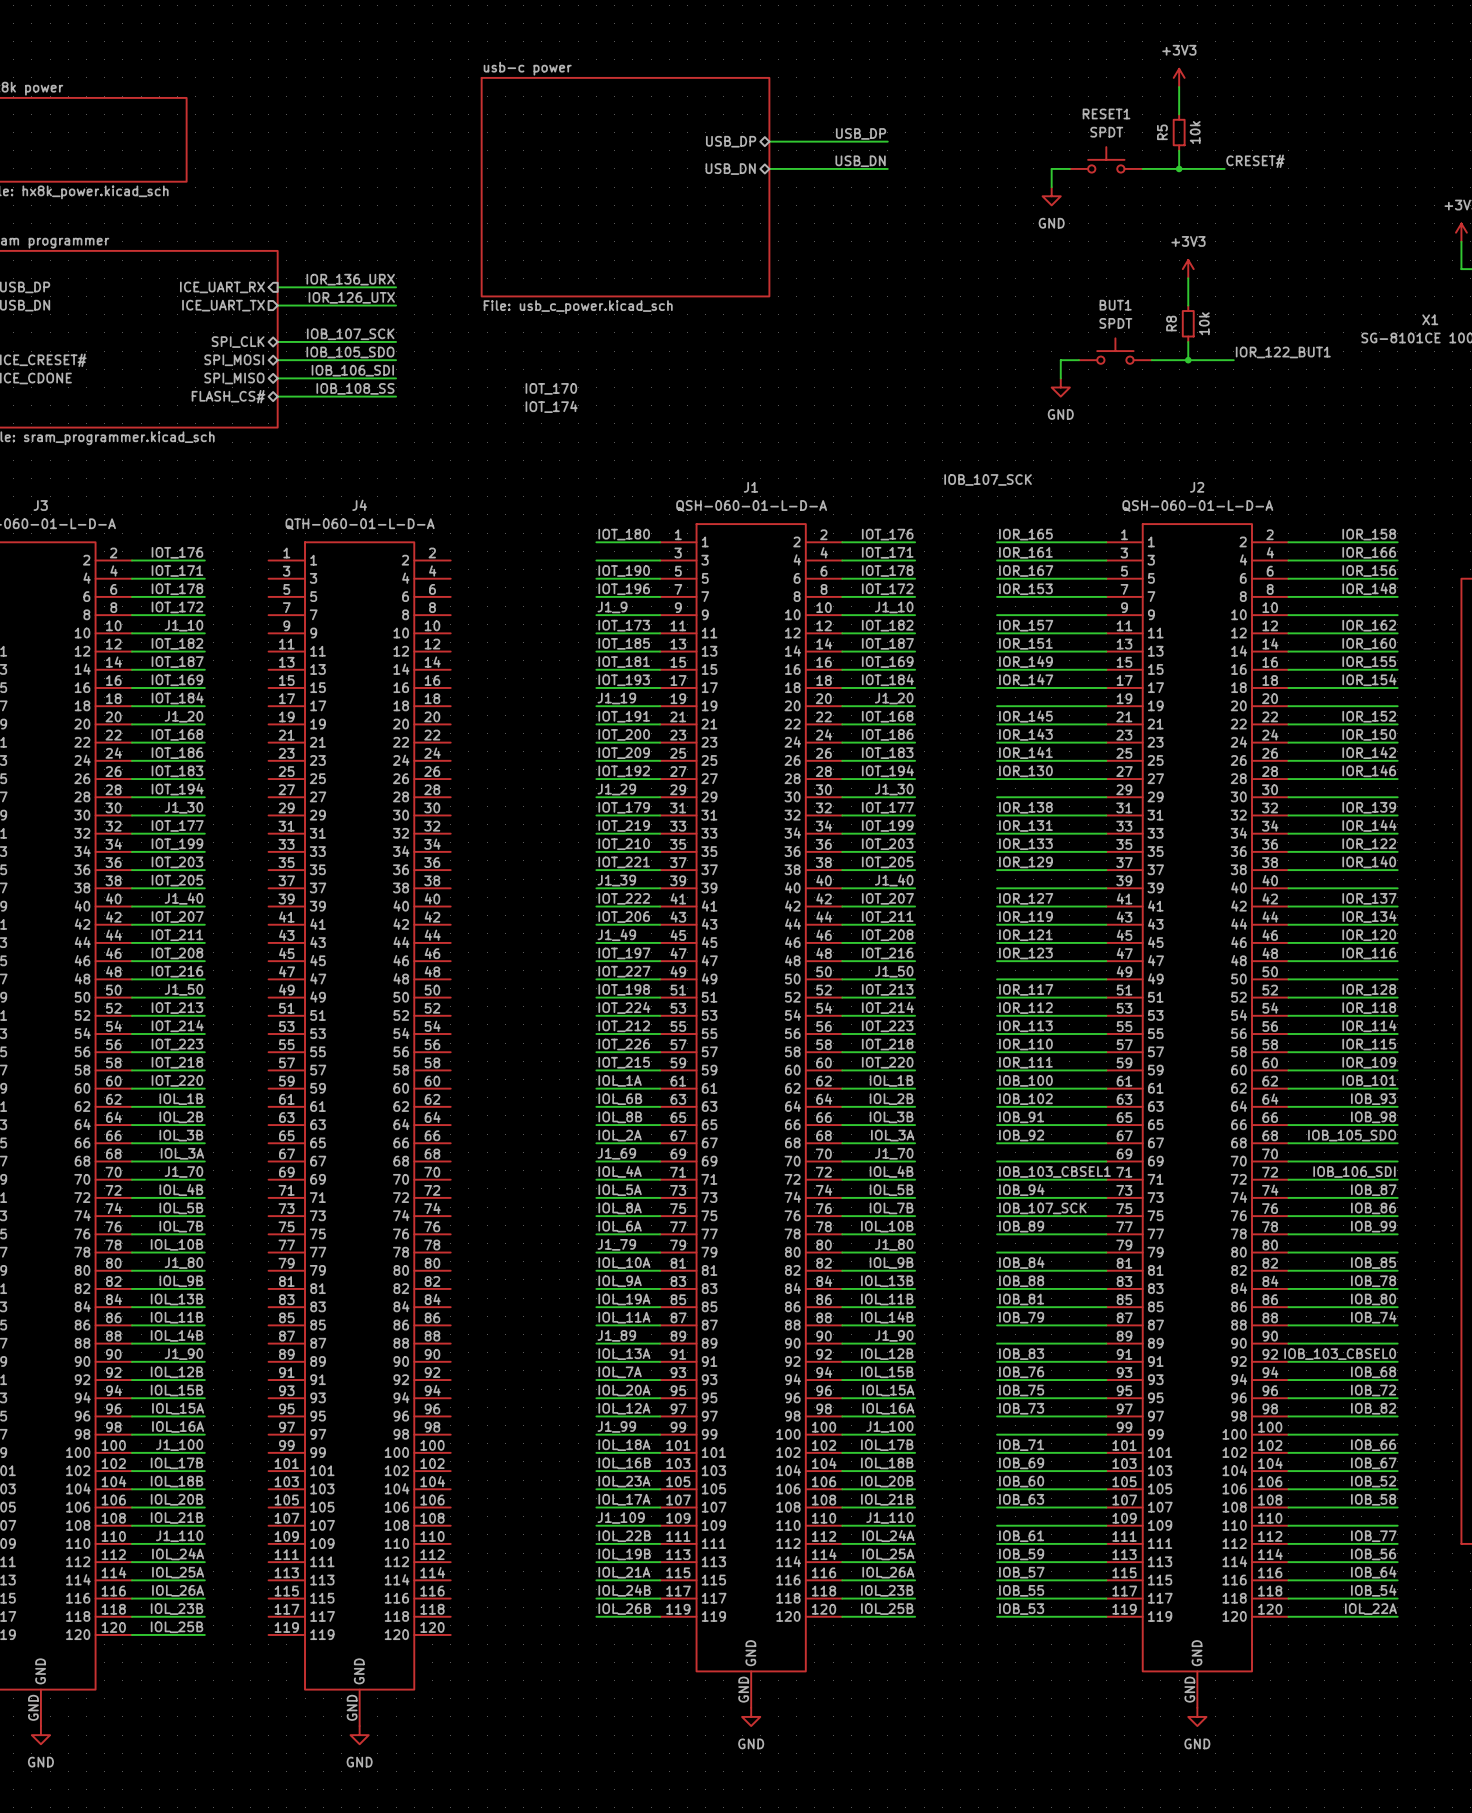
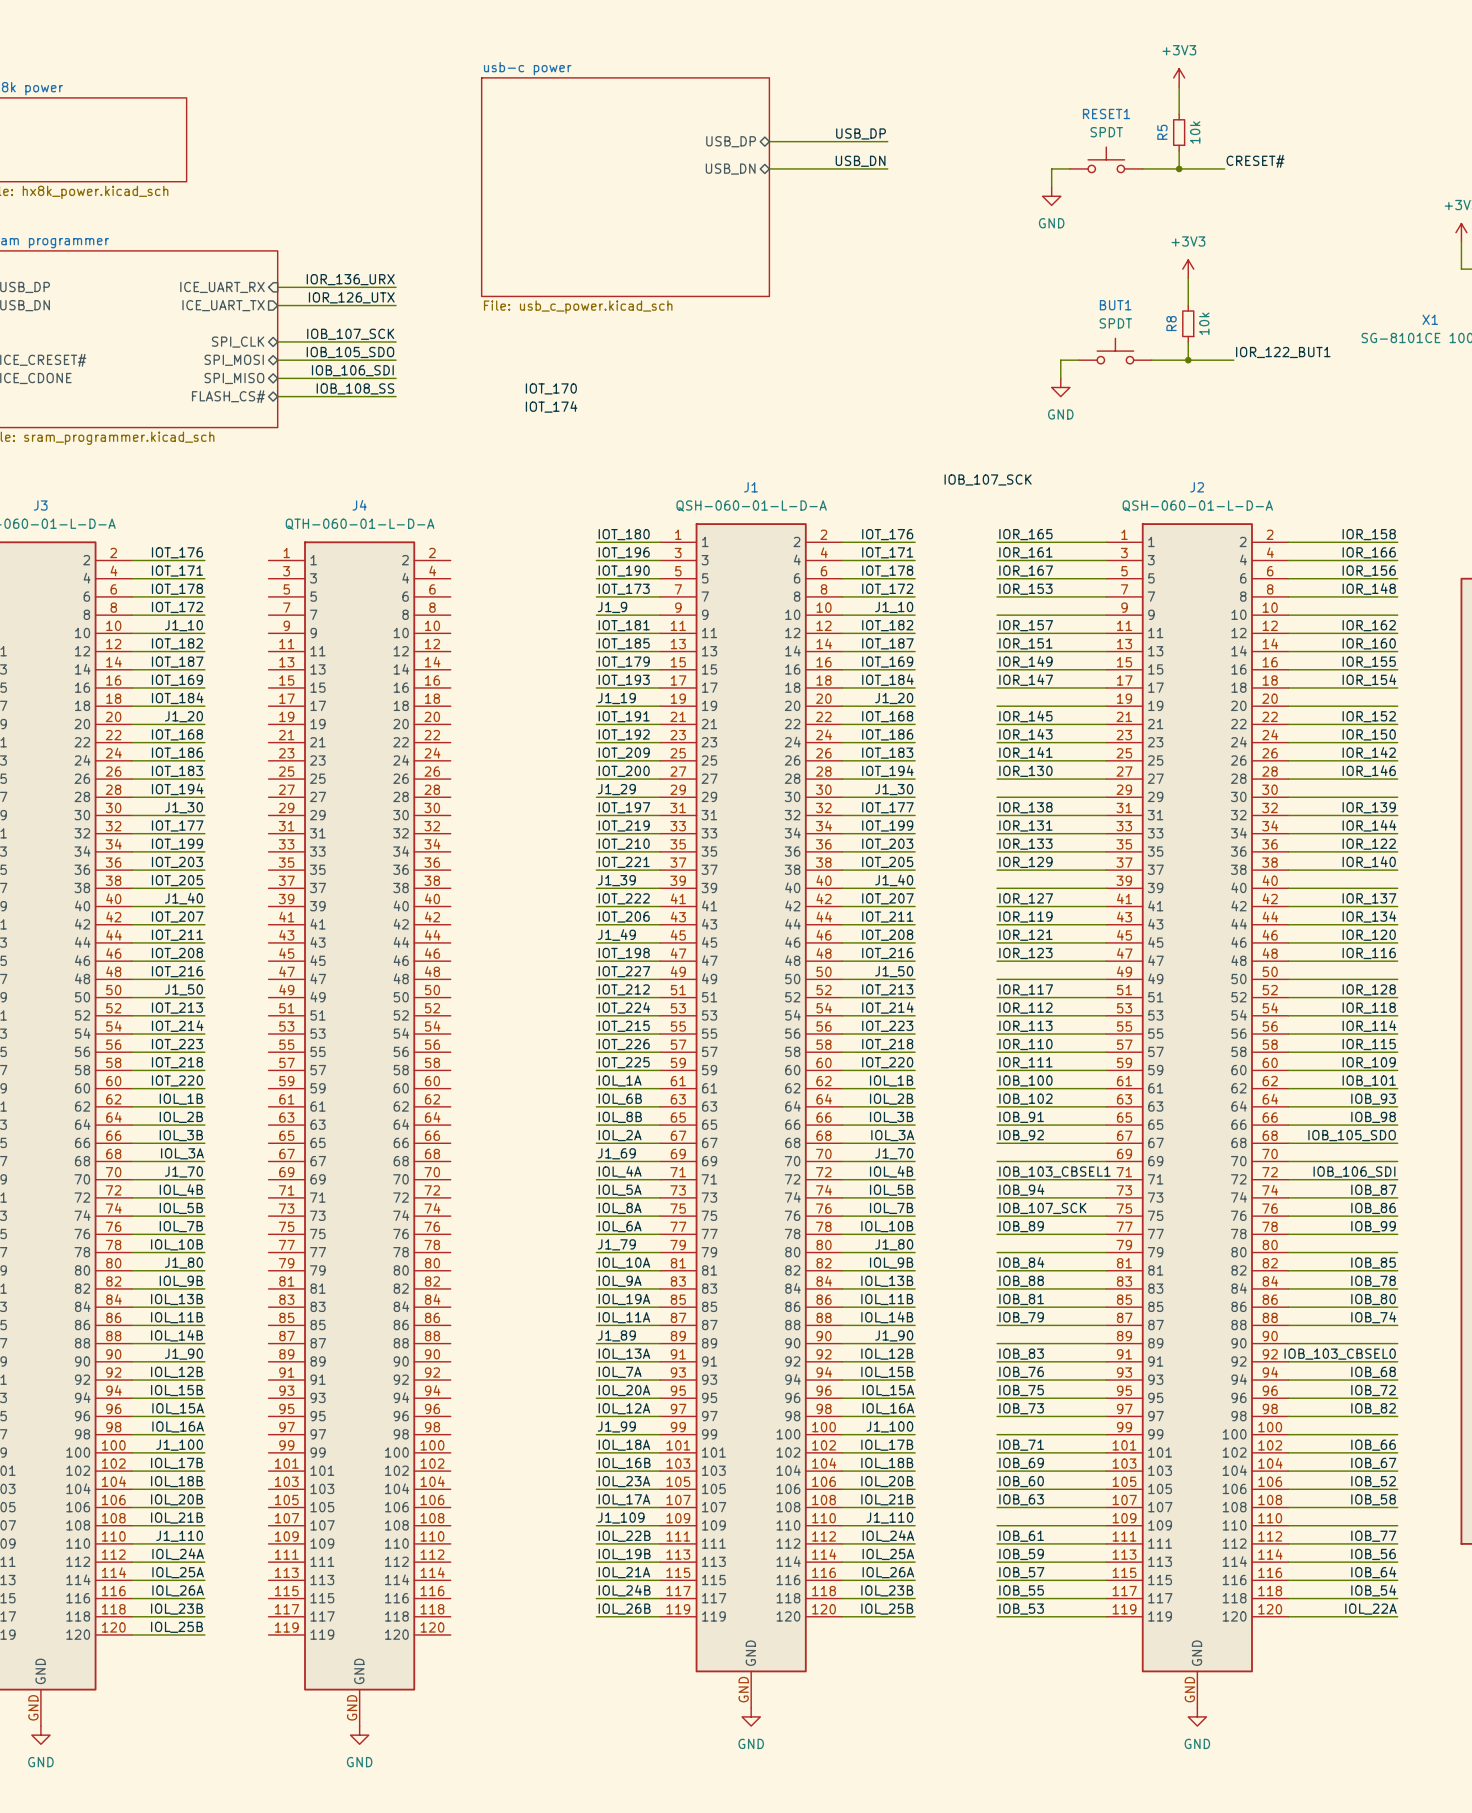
label: none -> IOT_196 (624, 552)
label: IOT_196 (624, 589) -> IOT_173 (624, 589)
label: IOT_173 (624, 625) -> IOT_181 (624, 625)
label: IOT_181 (624, 662) -> IOT_179 (624, 662)
label: IOT_200 (624, 734) -> IOT_192 (624, 734)
label: IOT_192 (624, 771) -> IOT_200 (624, 771)
label: IOT_179 (624, 807) -> IOT_197 (624, 807)
label: IOT_197 (624, 953) -> IOT_198 (624, 953)
label: IOT_198 (624, 989) -> IOT_212 (624, 989)
label: IOT_212 (624, 1026) -> IOT_215 (624, 1026)
label: IOT_215 (624, 1062) -> IOT_225 (624, 1062)

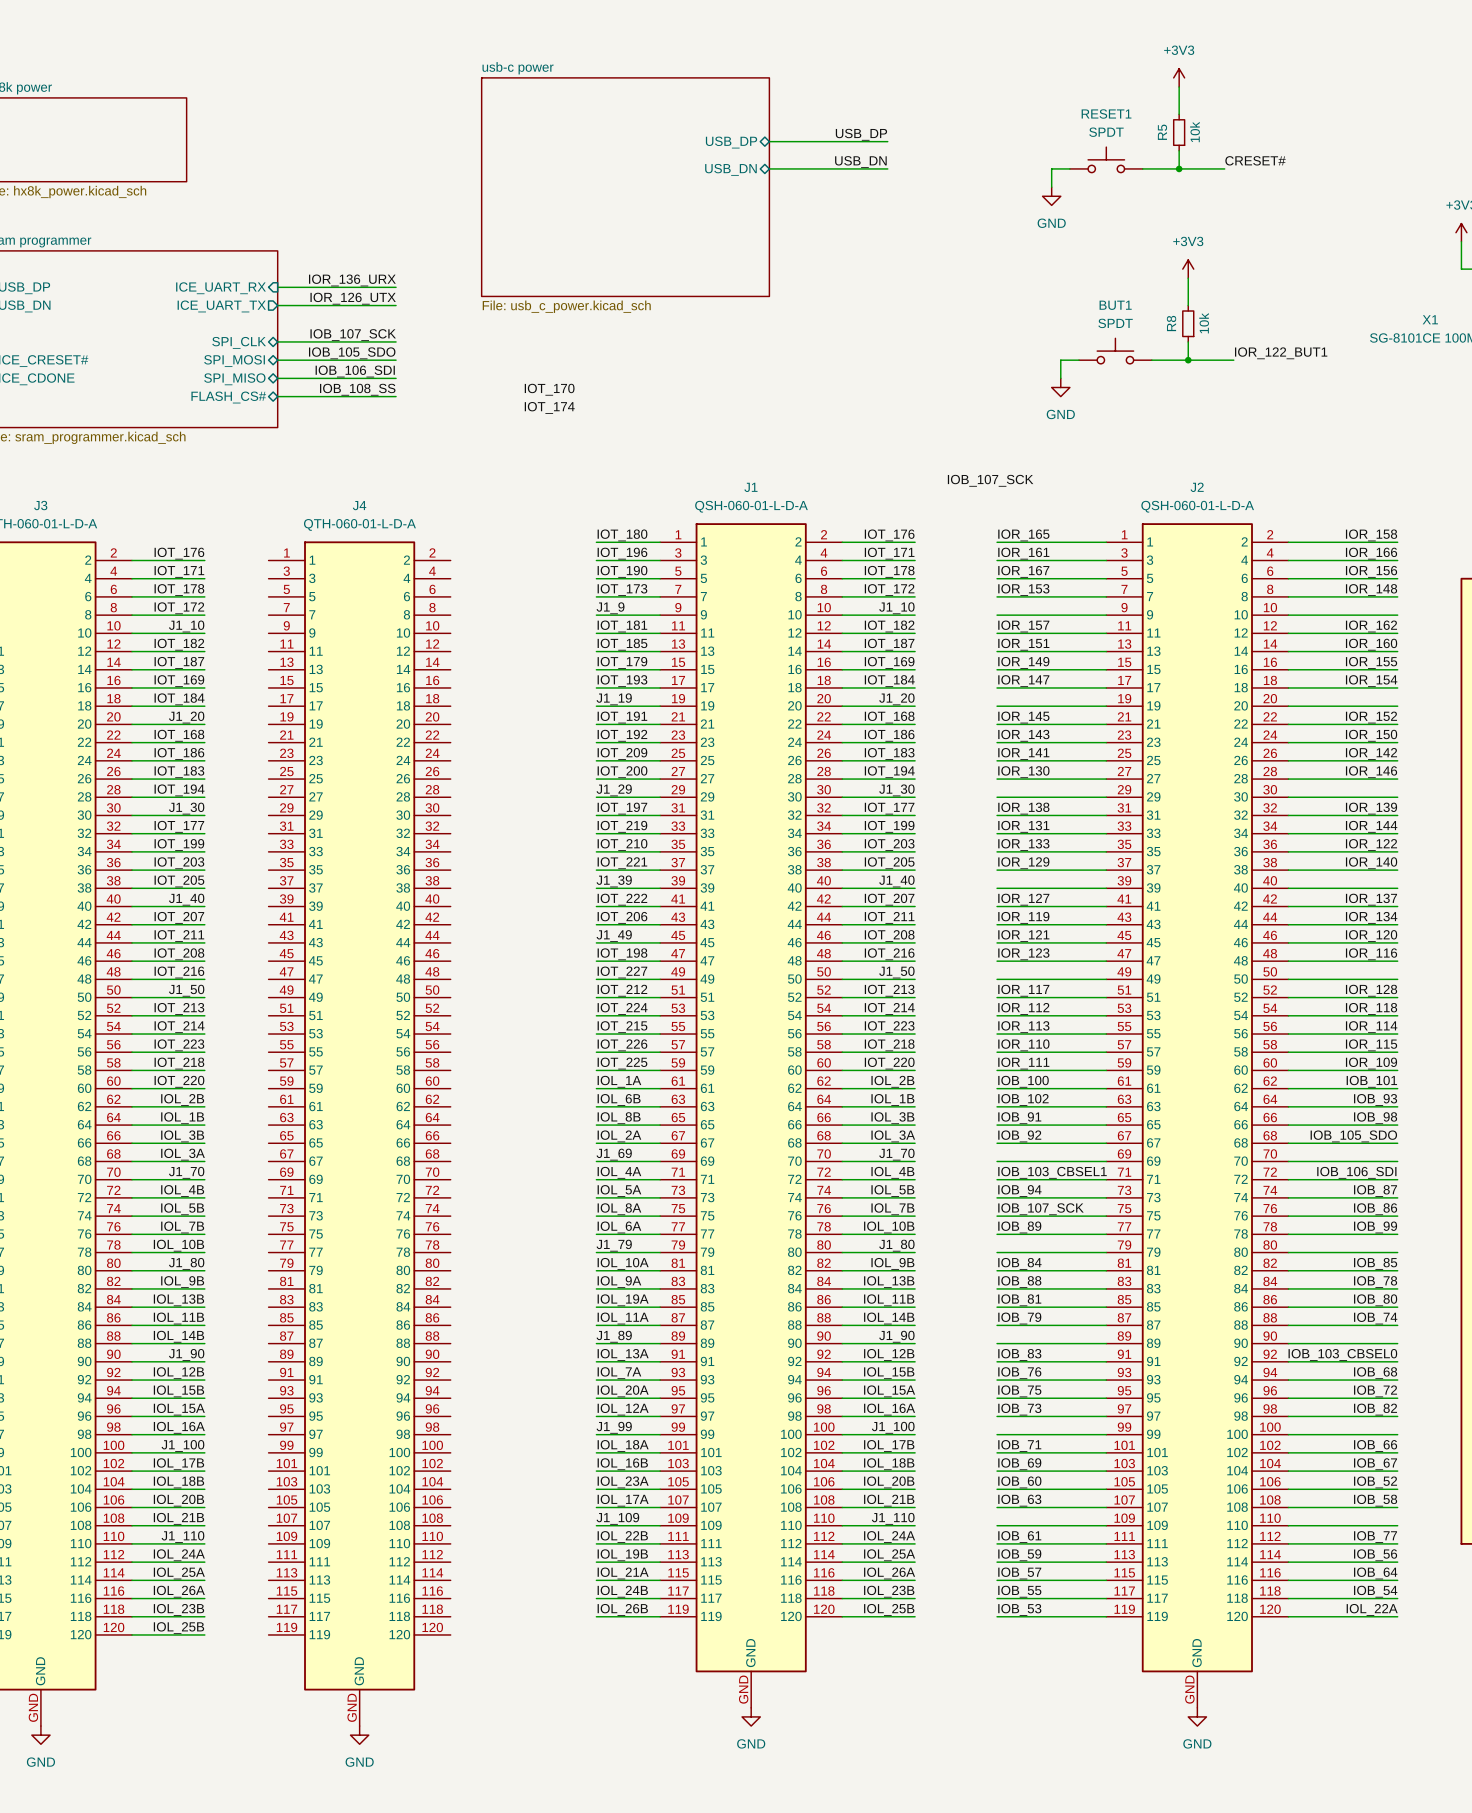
label: IOL_1B (891, 1080) -> IOL_2B (892, 1081)
label: IOL_1B (181, 1099) -> IOL_2B (182, 1099)
label: IOL_2B (891, 1099) -> IOL_1B (892, 1099)
label: IOL_2B (181, 1117) -> IOL_1B (182, 1118)

